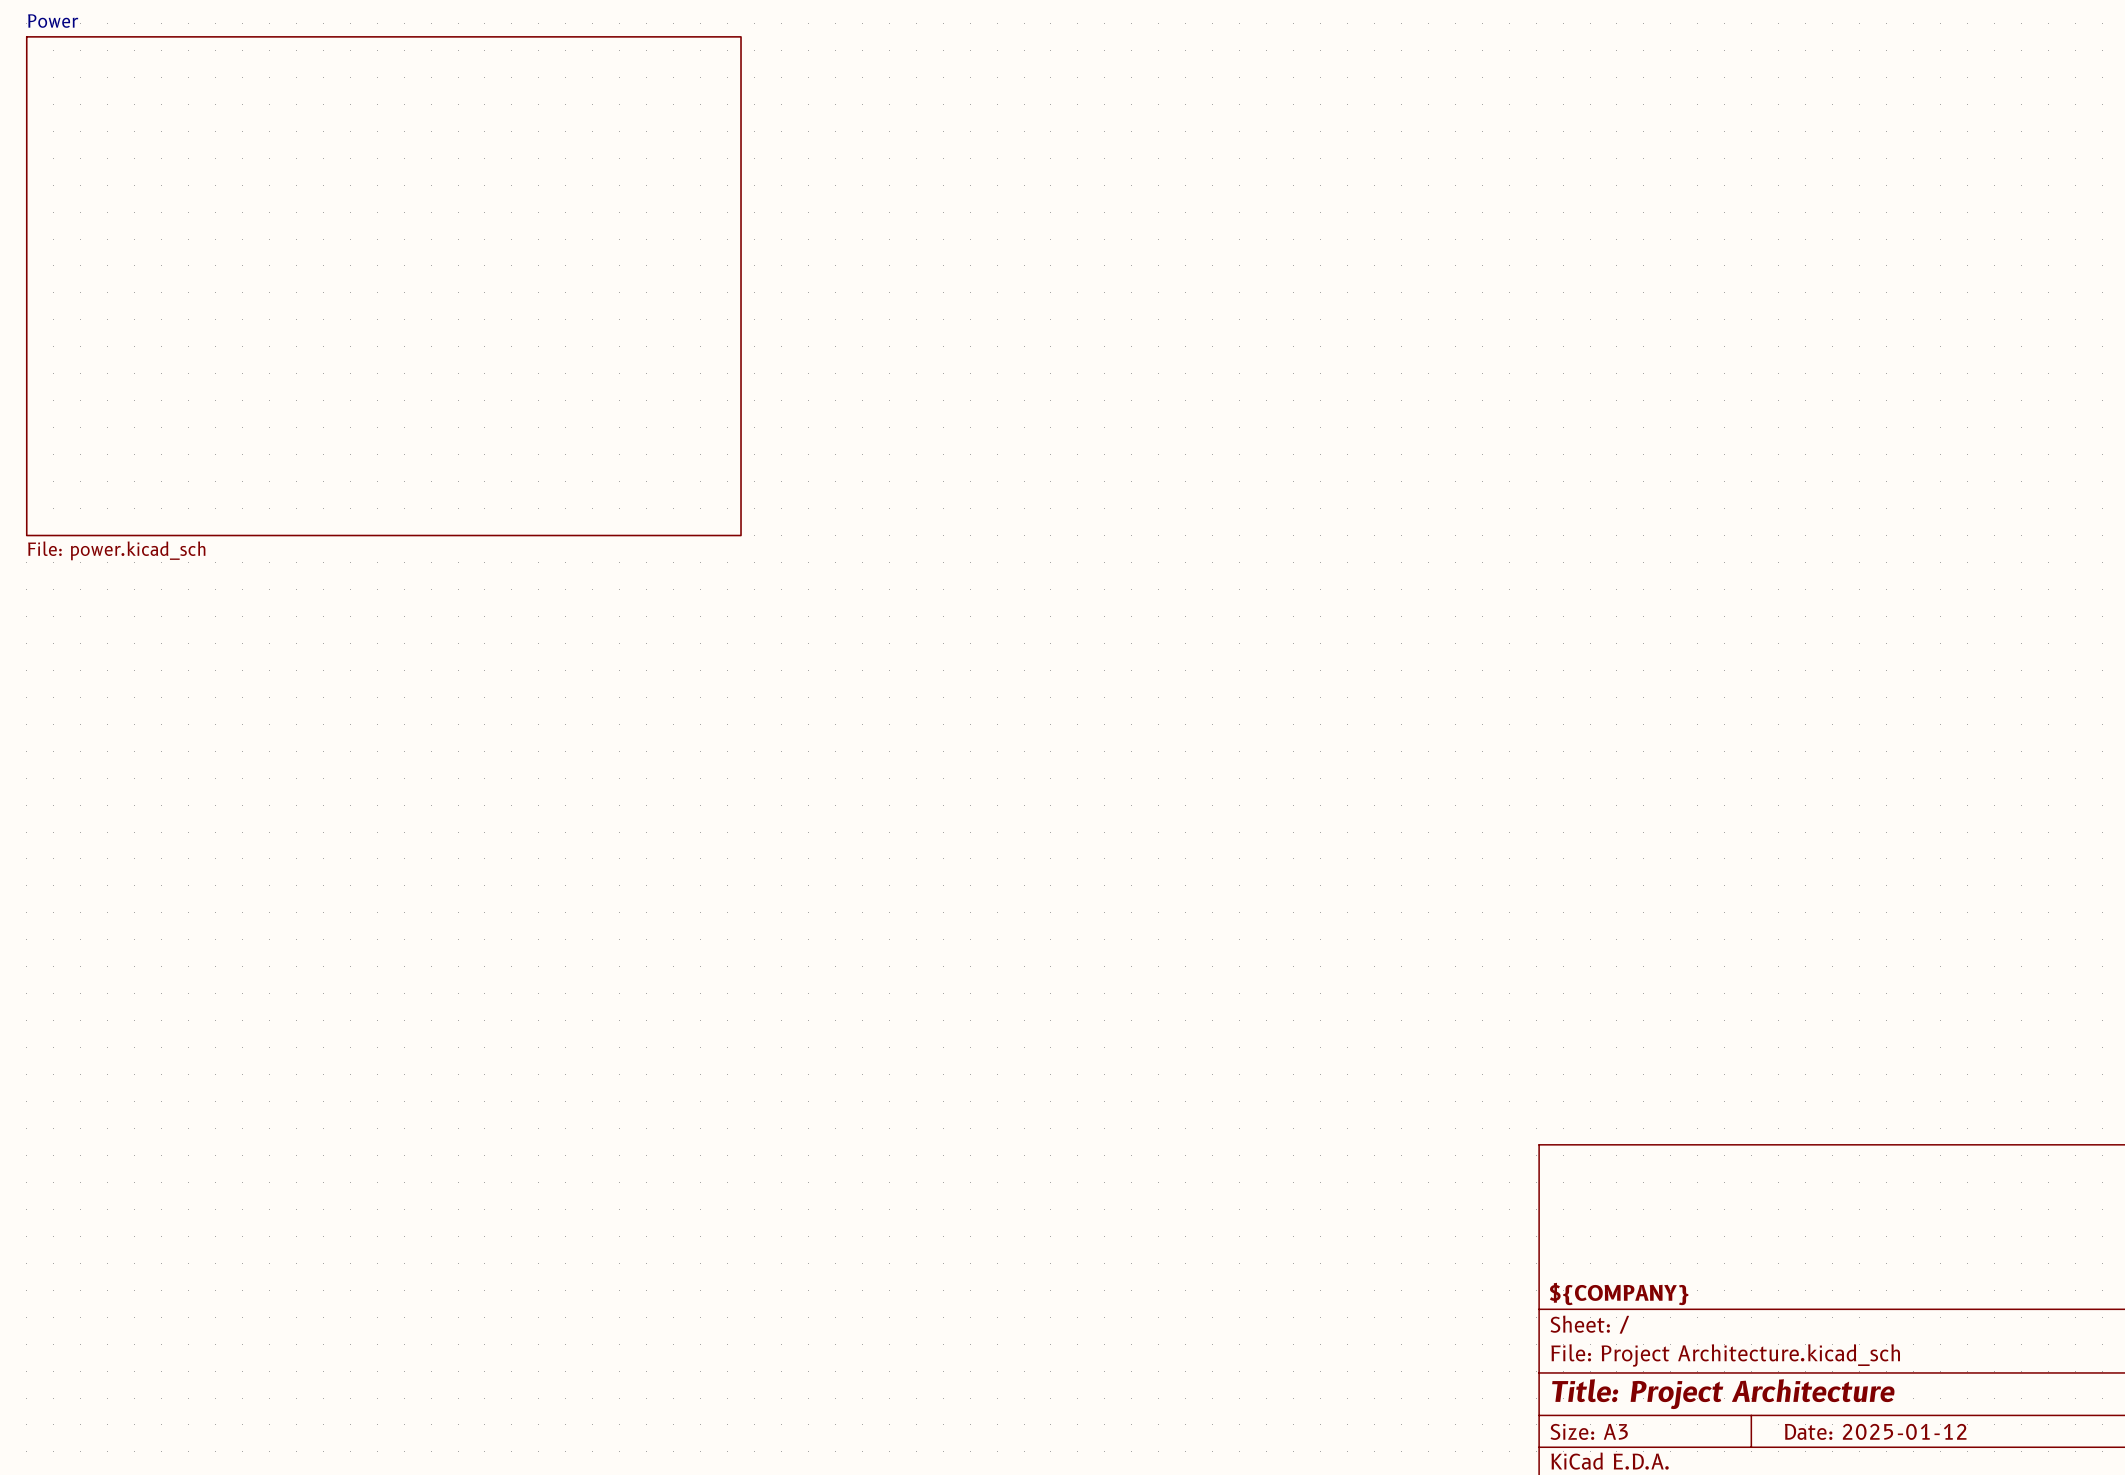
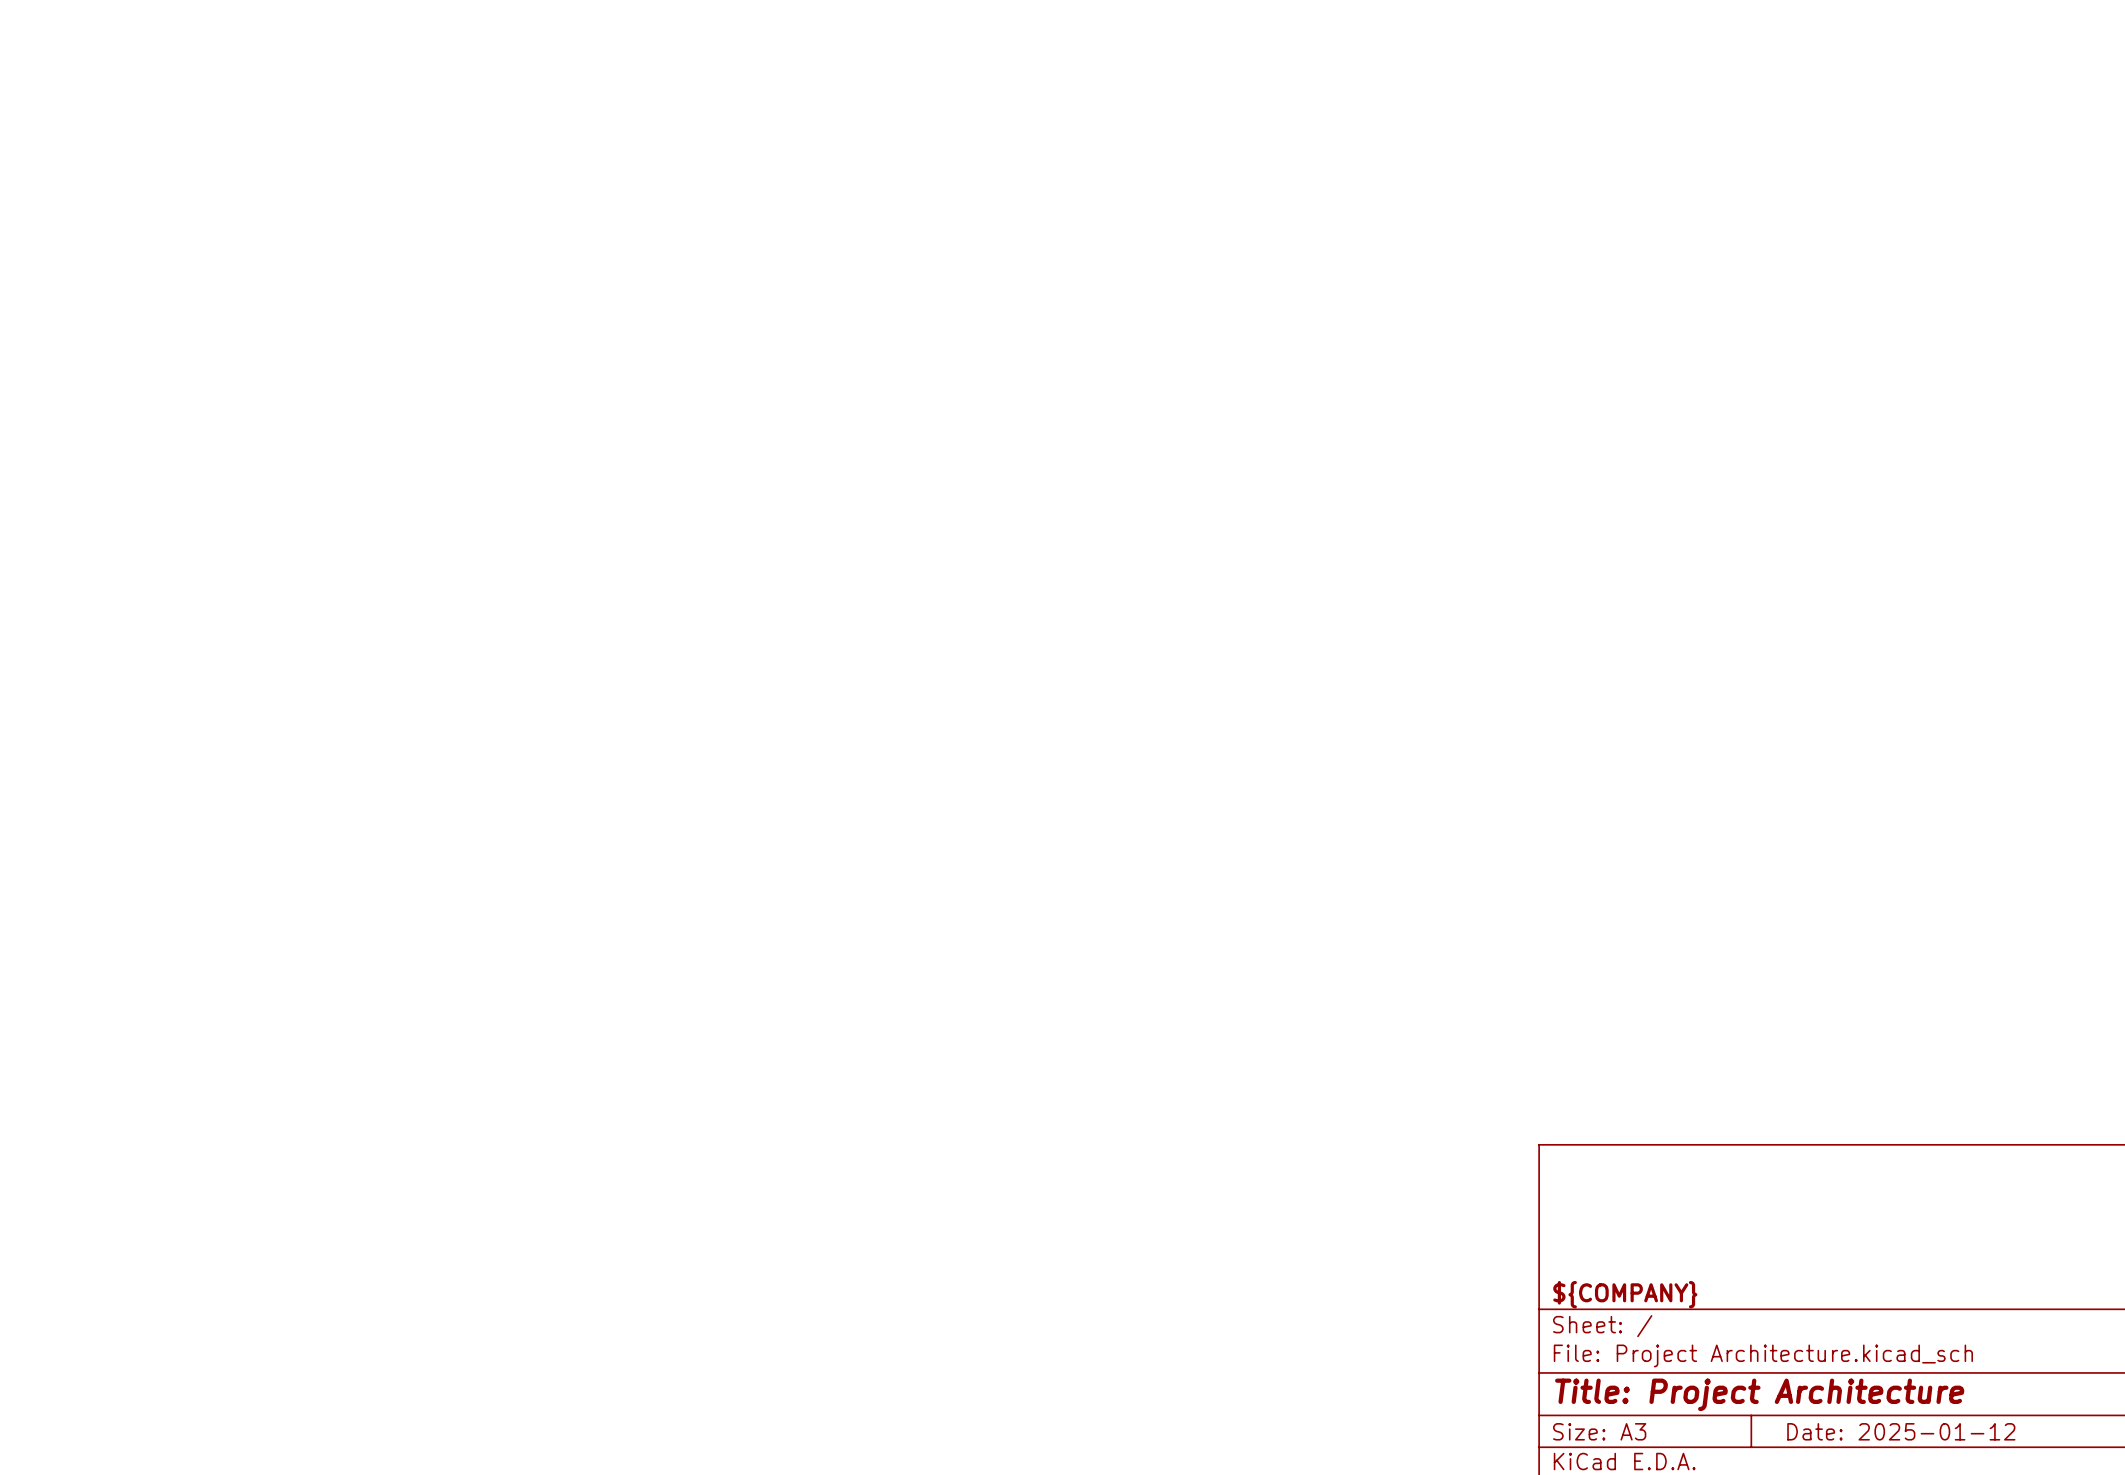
sheet Power: File: power.kicad_sch (383, 286) -> none

